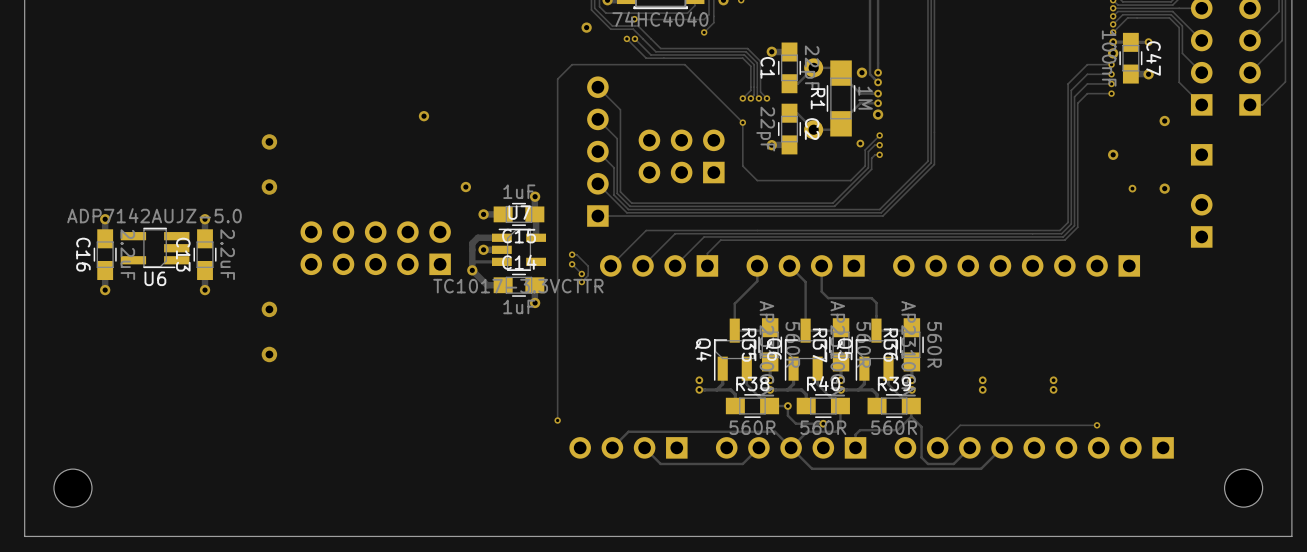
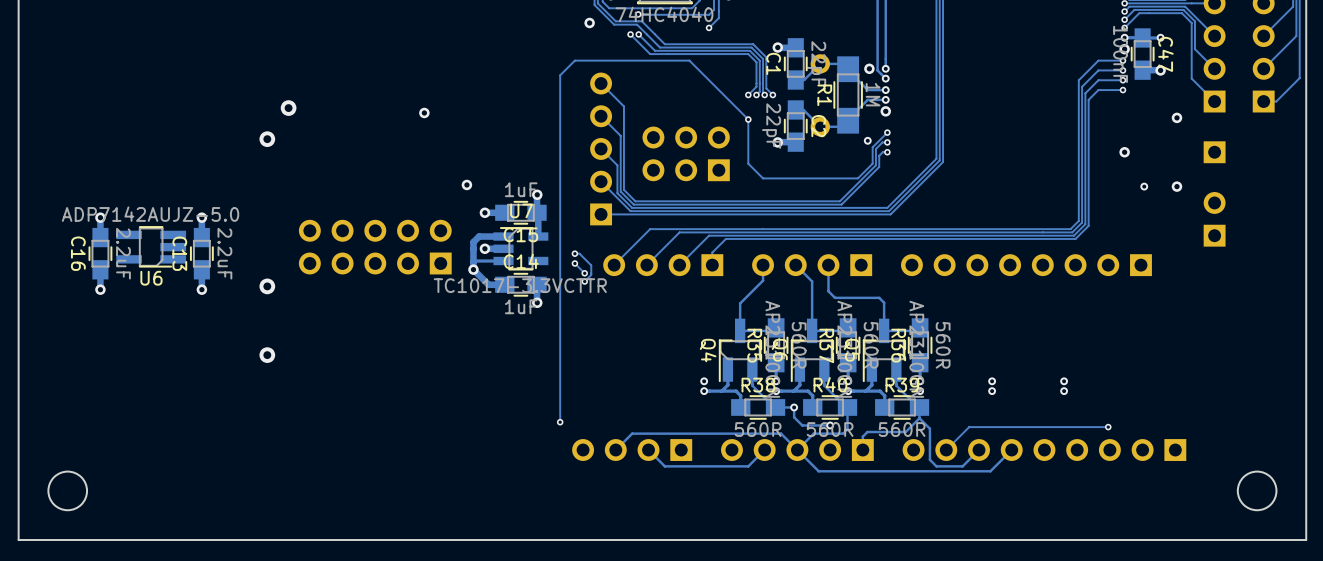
via: none -> (288, 108)
via: (269, 187) -> none
via position: (269, 309) -> (267, 286)

